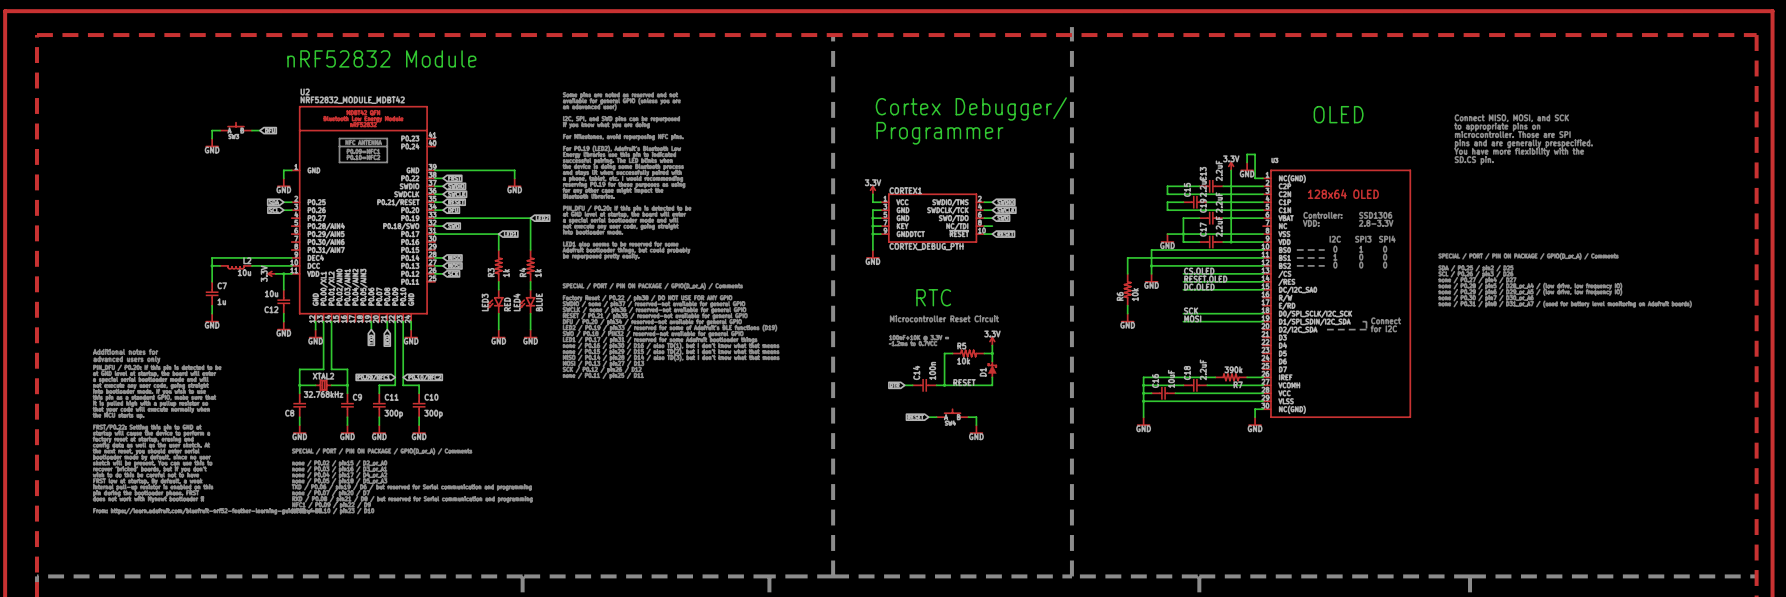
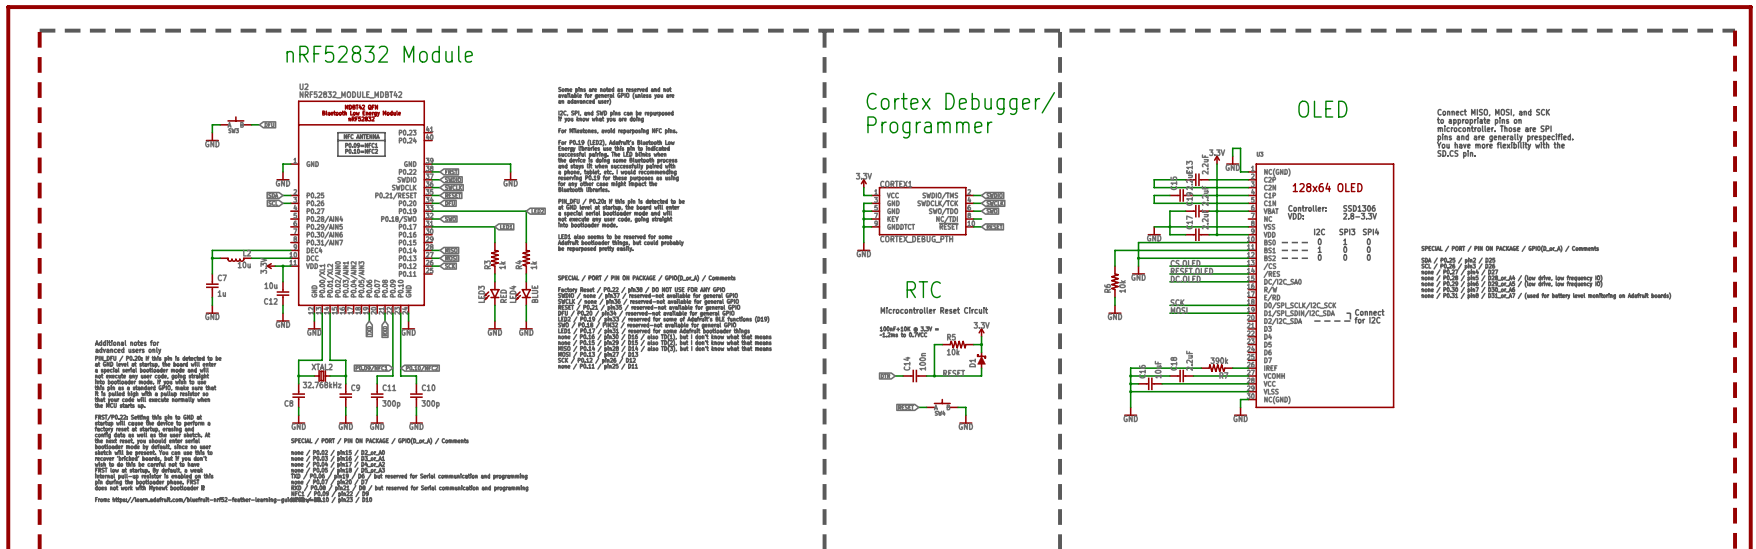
line: (36, 35) (1756, 35) -> none
line: none -> (39, 30) (1735, 30)

